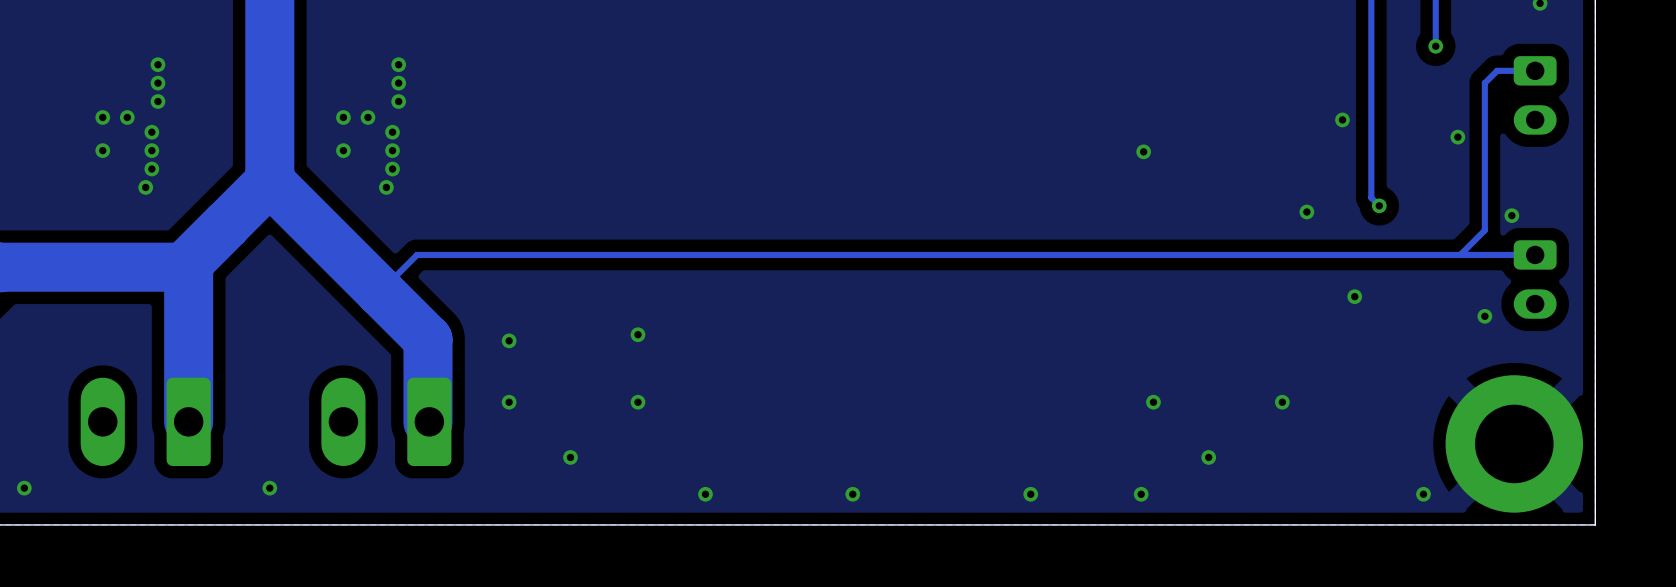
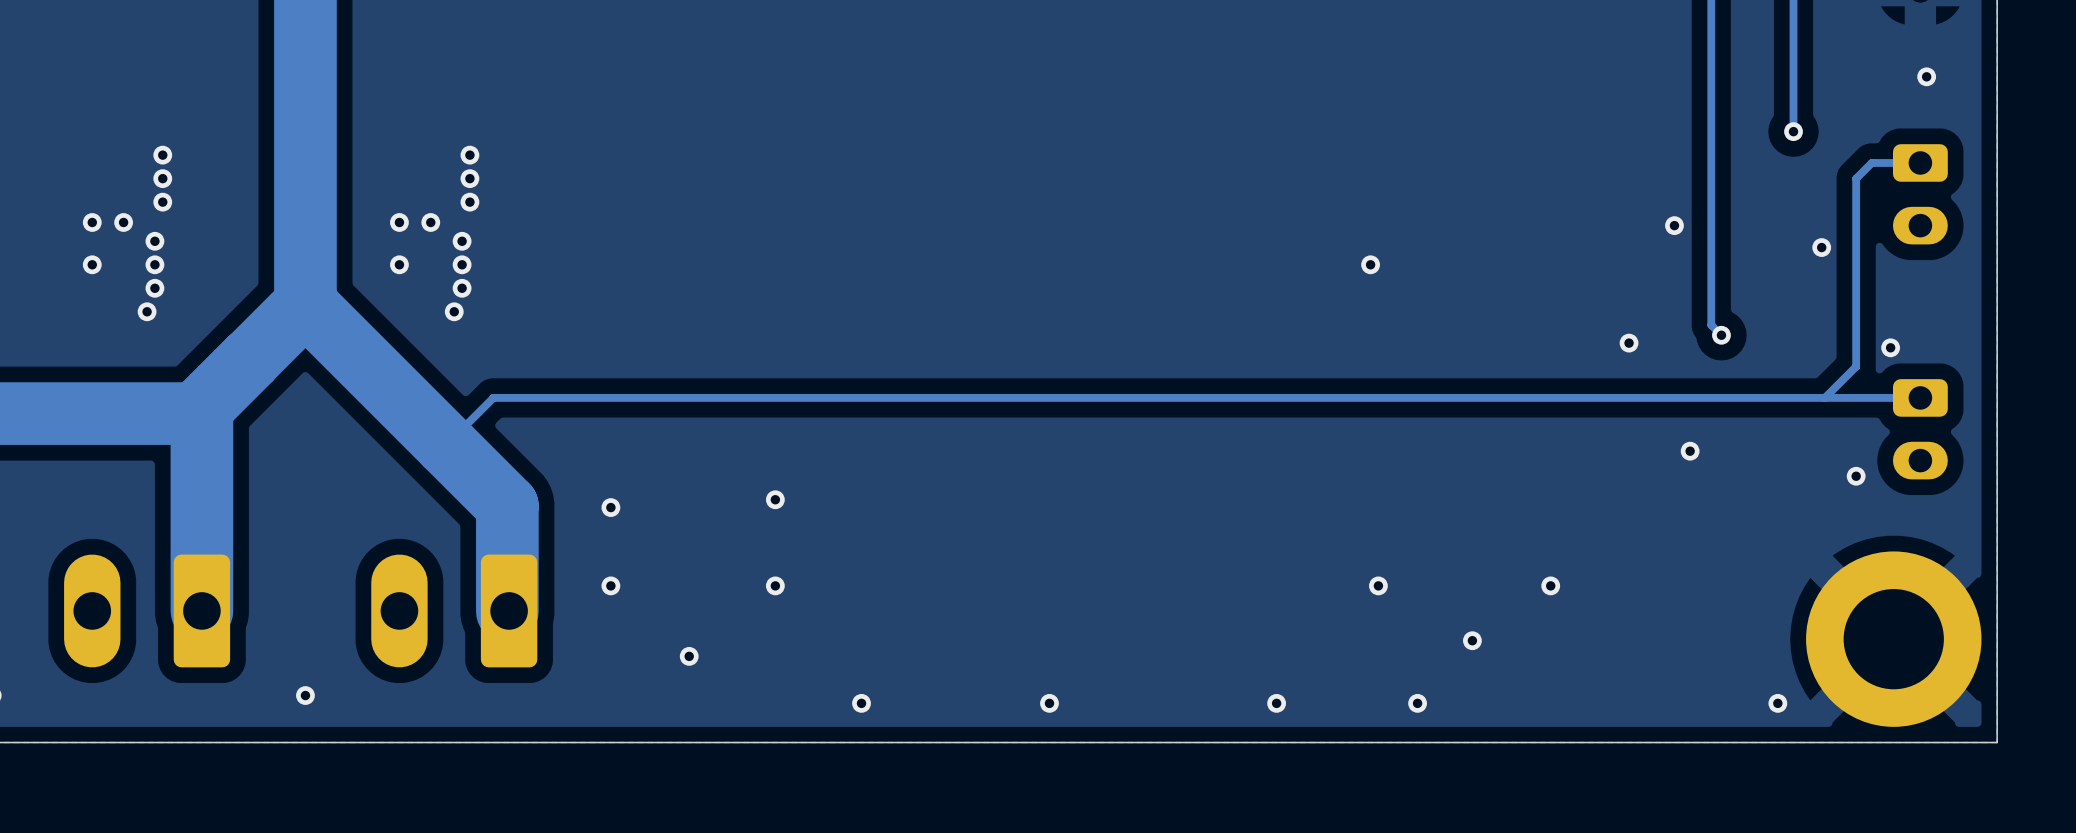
via position: (1143, 151) -> (1370, 264)
via: none -> (1378, 585)
via: (1153, 402) -> none
via: none -> (1550, 585)
via: (1282, 402) -> none
via: none -> (1472, 640)
via: (1208, 457) -> none

